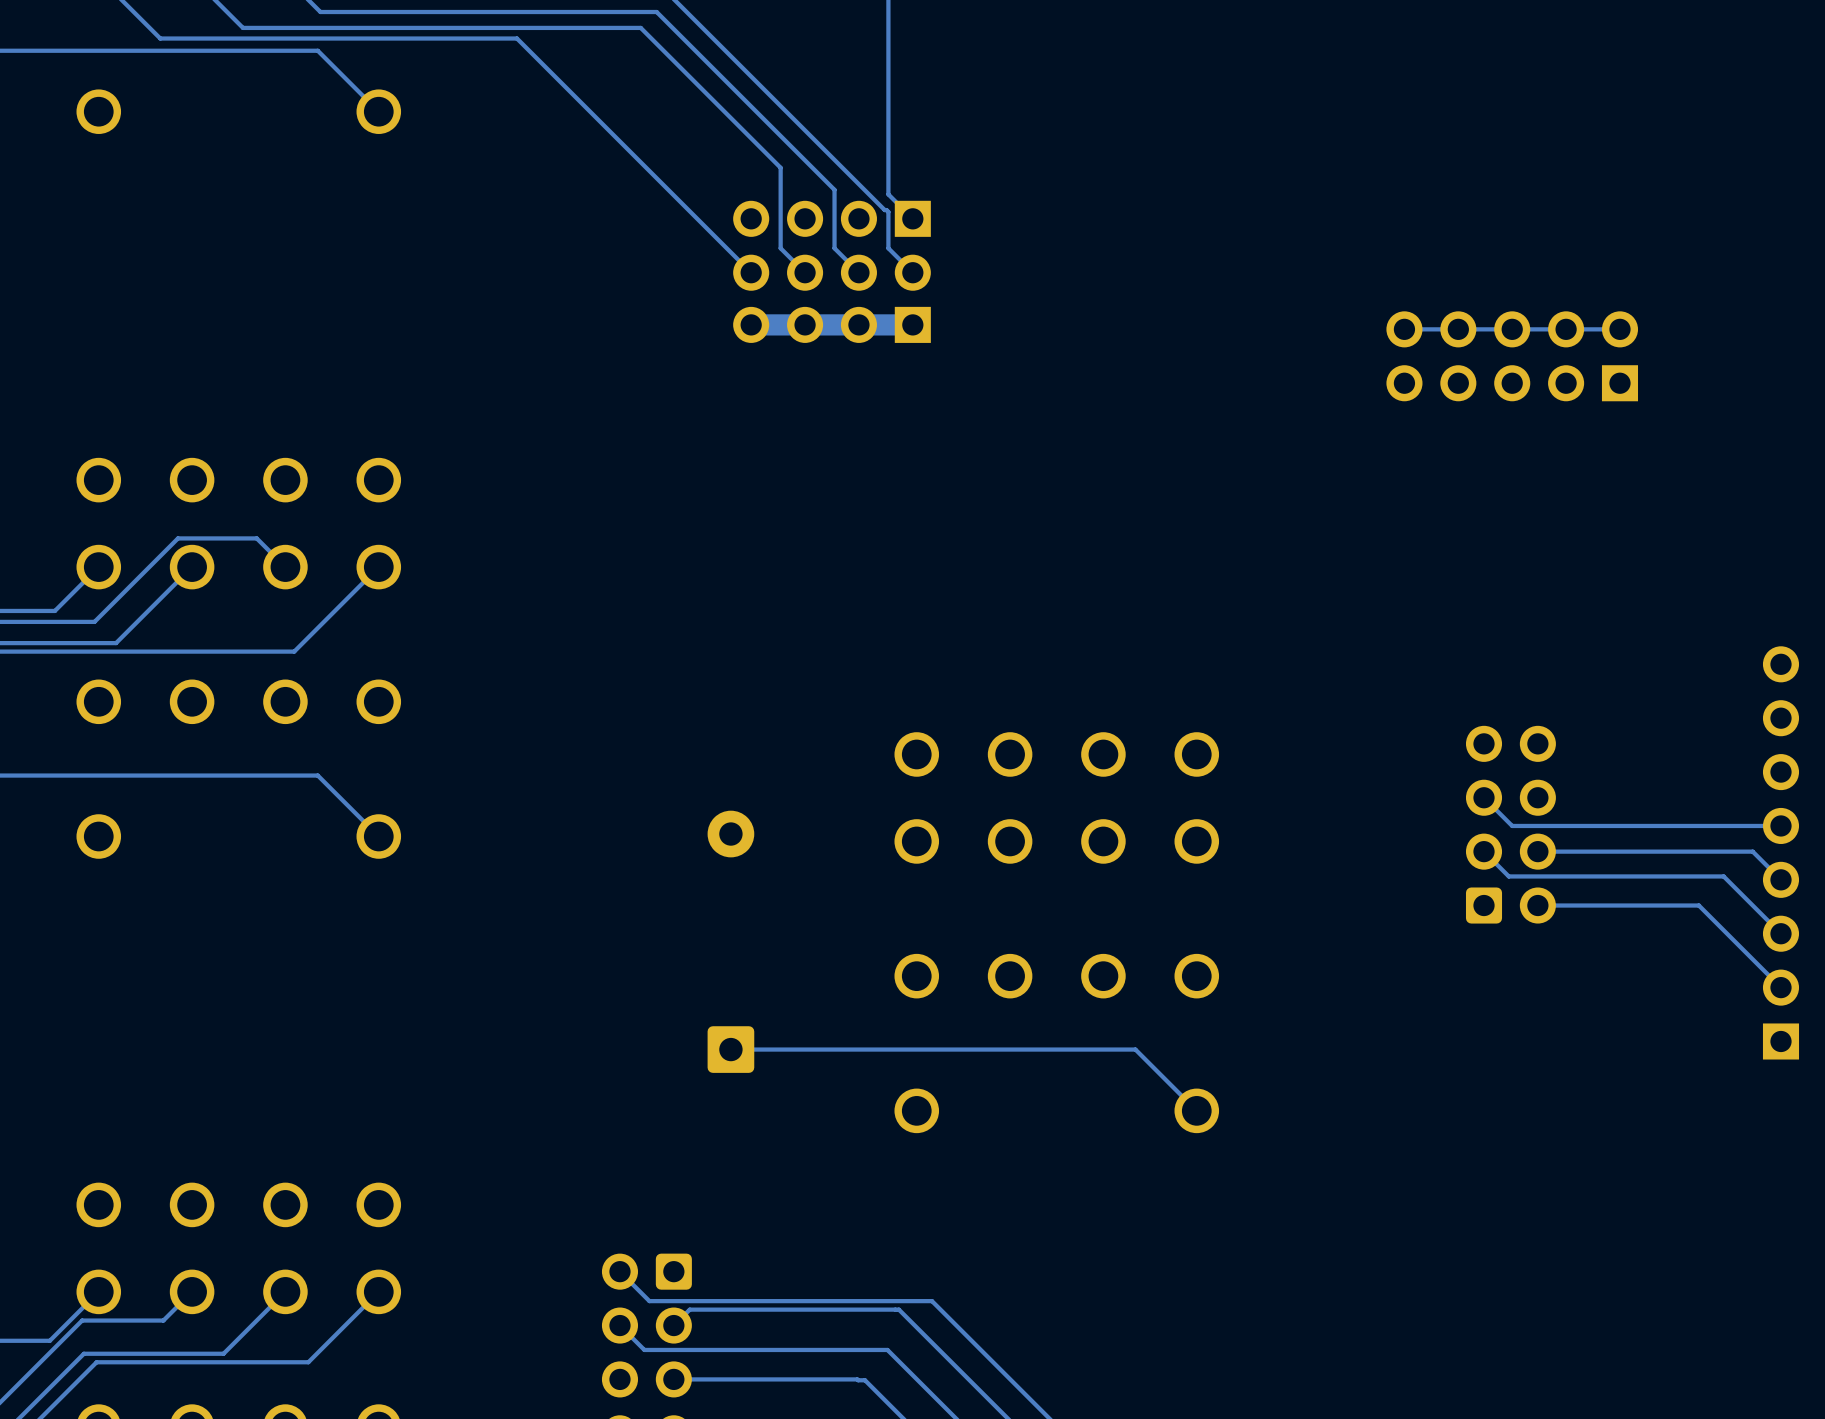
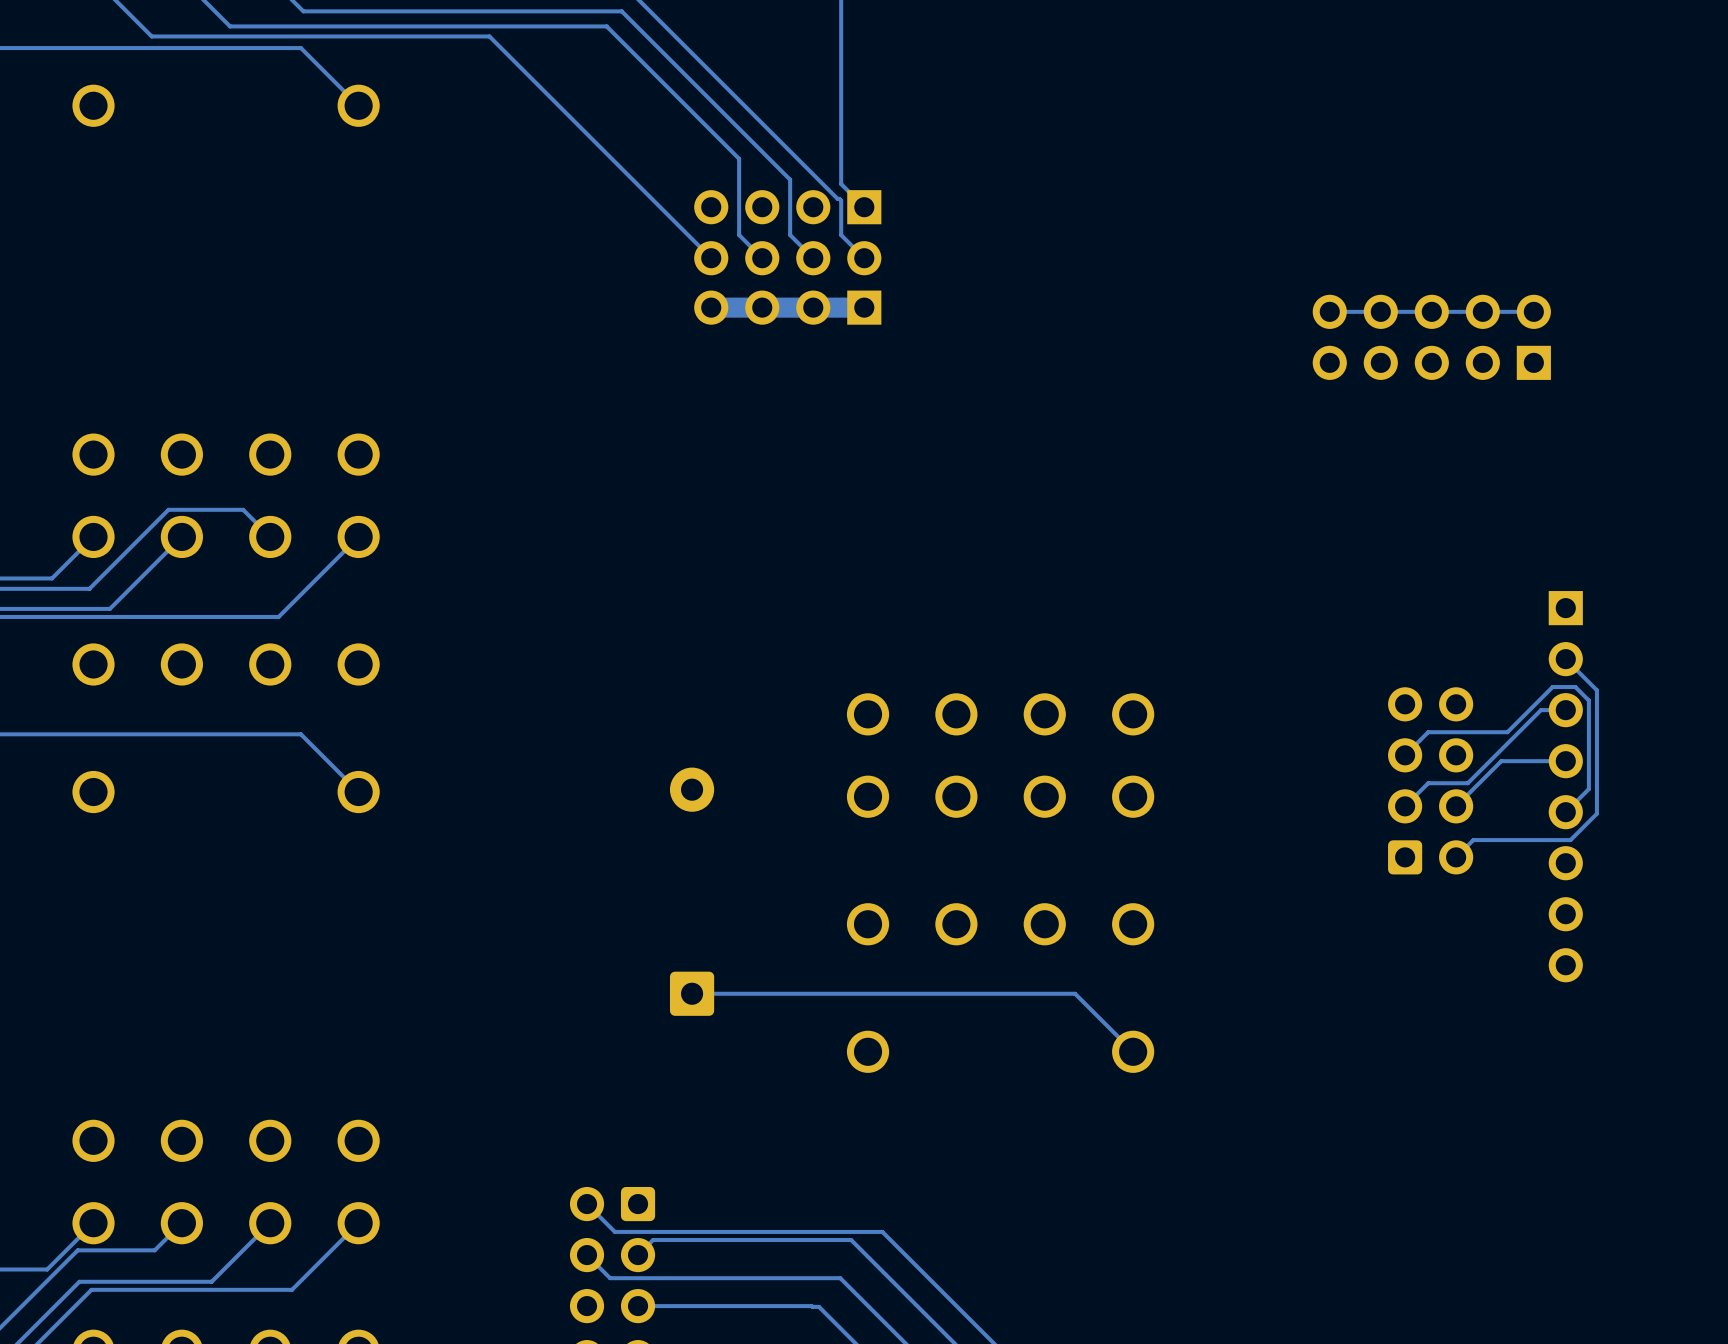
track: (1484, 797) (1512, 825) (1780, 825) -> (1405, 755) (1428, 732) (1507, 732) (1552, 687) (1575, 687) (1588, 700) (1588, 789) (1565, 812)
track: (1484, 851) (1508, 876) (1723, 876) (1780, 933) -> (1405, 806) (1428, 783) (1467, 783) (1540, 710) (1565, 710)
track: (1537, 851) (1752, 851) (1780, 879) -> (1456, 806) (1501, 761) (1565, 761)
part rotation: 0° (1780, 852) -> 180° (1565, 786)
track: (1537, 905) (1698, 905) (1780, 987) -> (1456, 857) (1473, 840) (1570, 840) (1596, 813) (1596, 690) (1565, 659)

